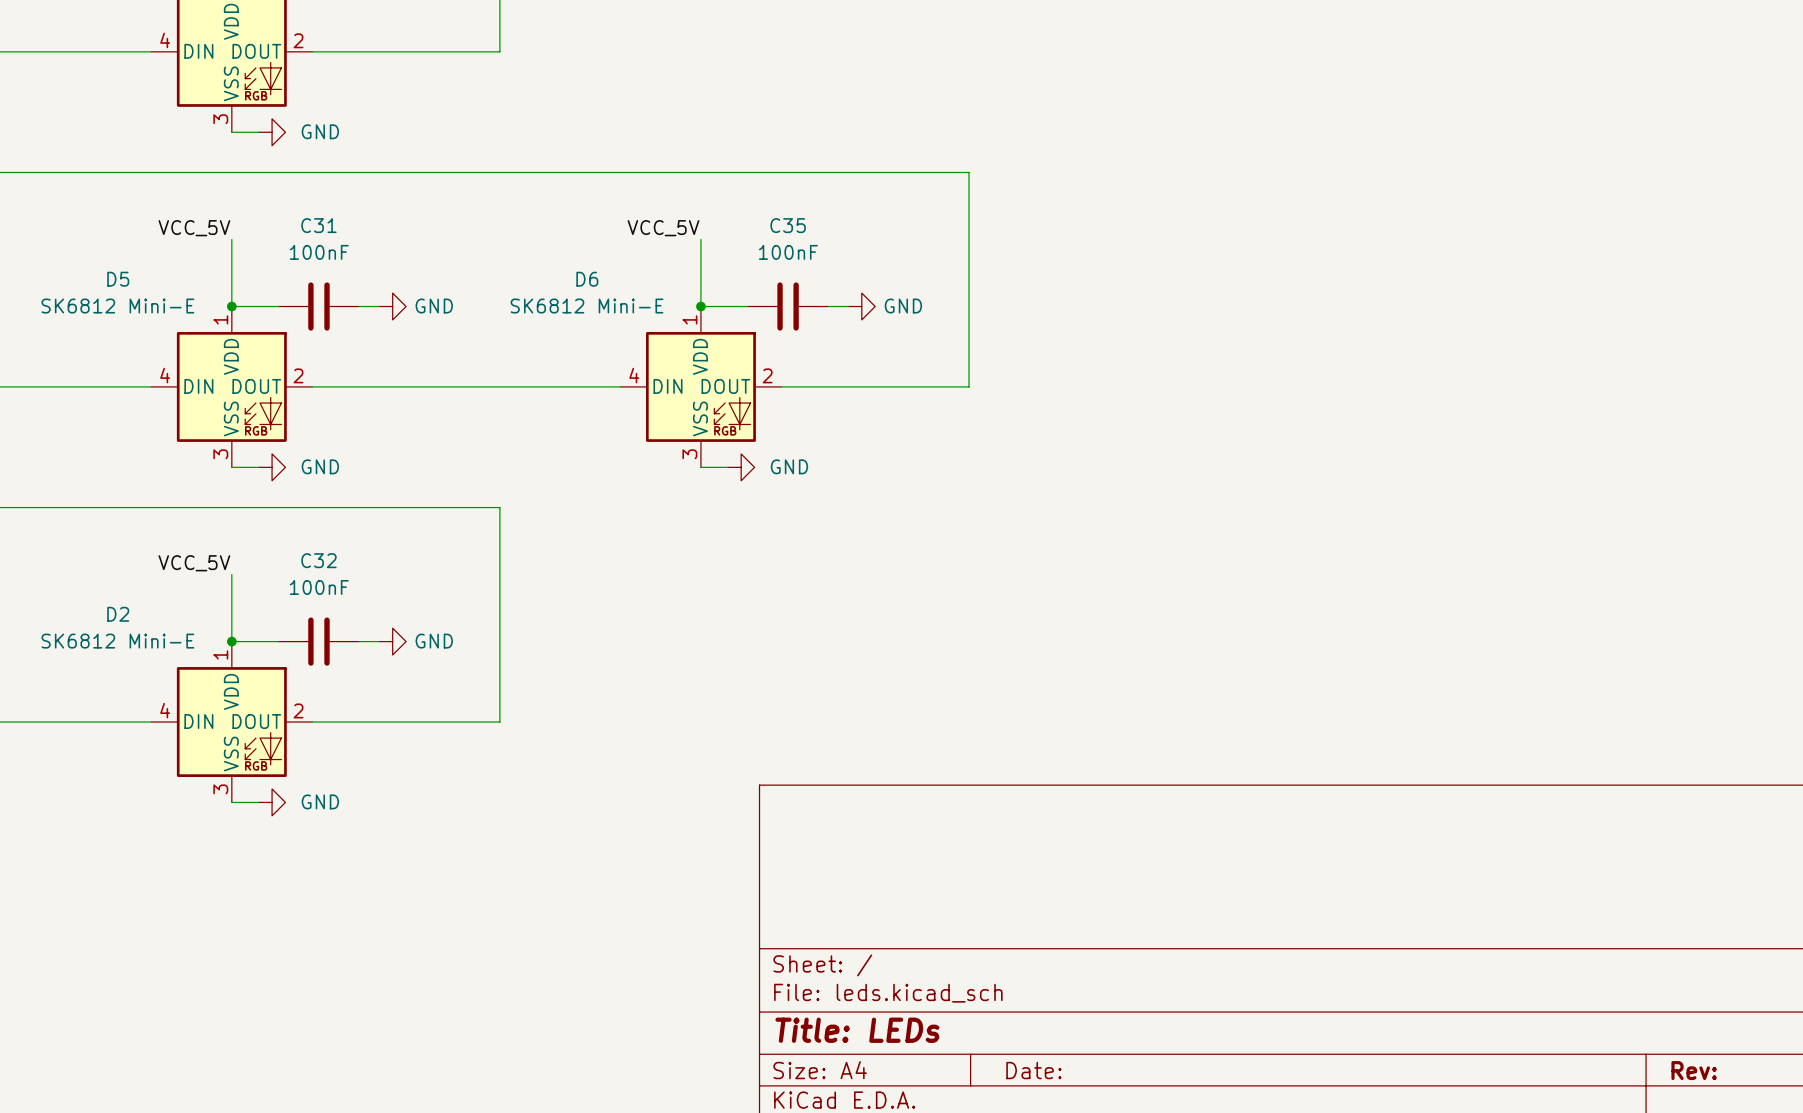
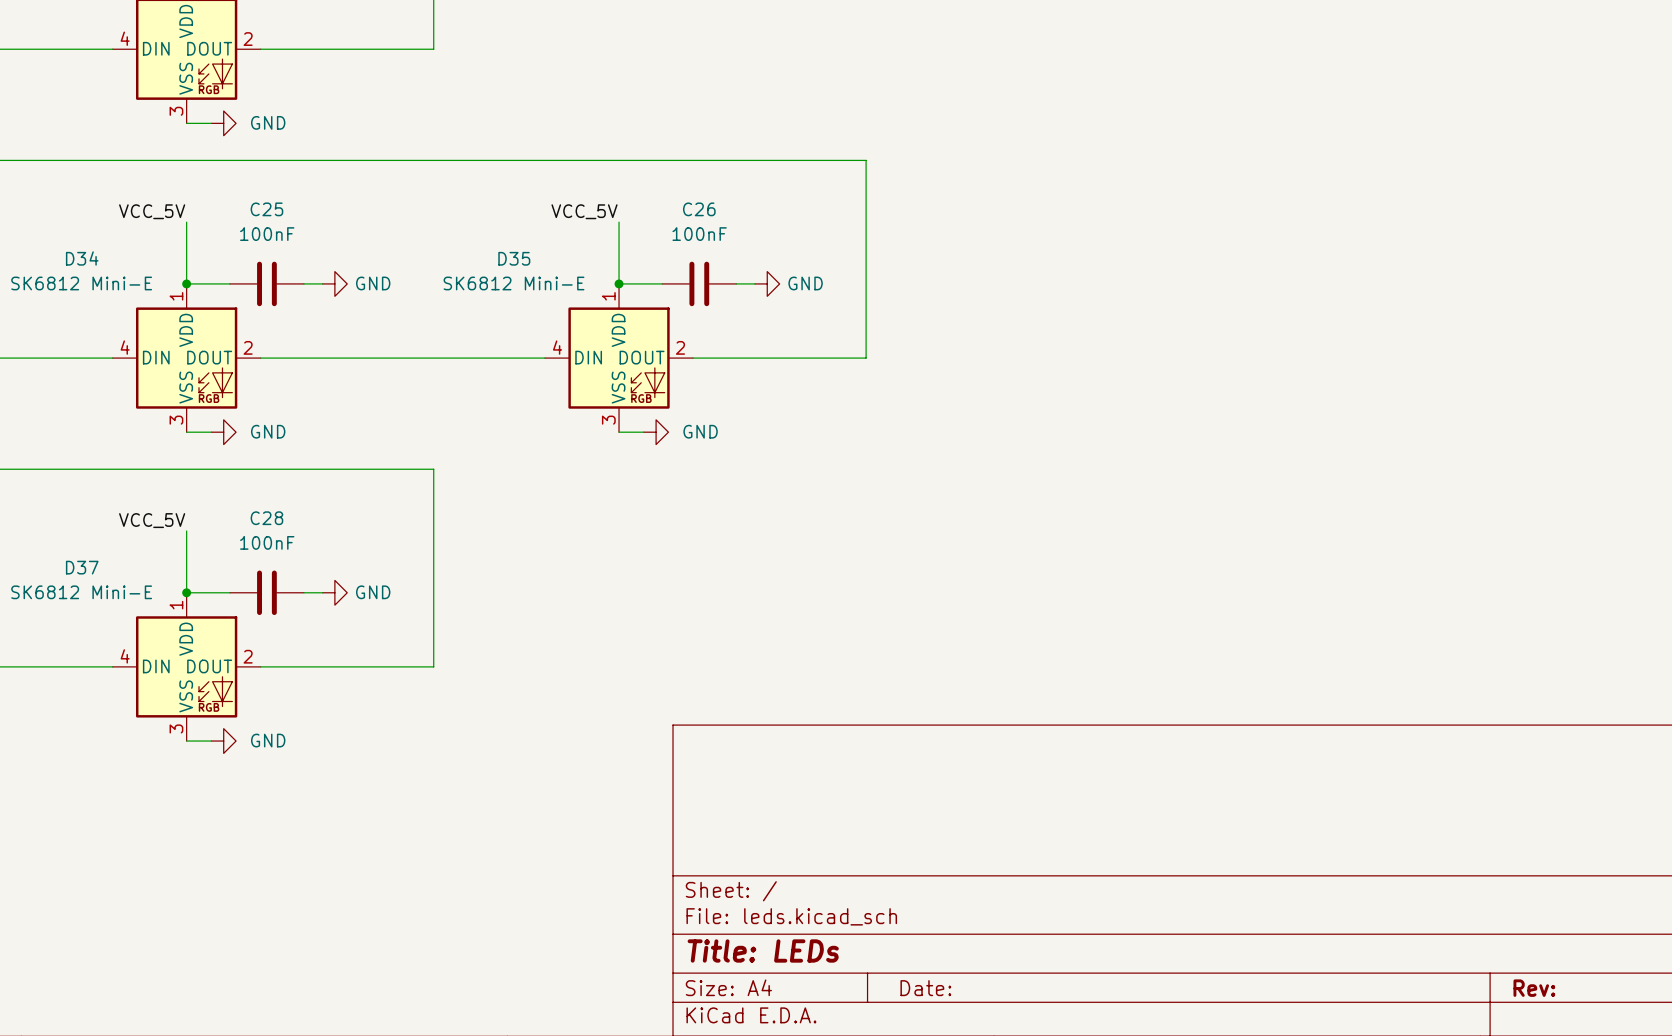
C31 name: C31 (318, 225) -> C25 (266, 209)
C35 name: C35 (788, 225) -> C26 (699, 209)
D5 name: D5 (118, 279) -> D34 (82, 258)
D6 name: D6 (587, 279) -> D35 (514, 258)
C32 name: C32 (318, 560) -> C28 (266, 518)
D2 name: D2 (118, 614) -> D37 (82, 567)

